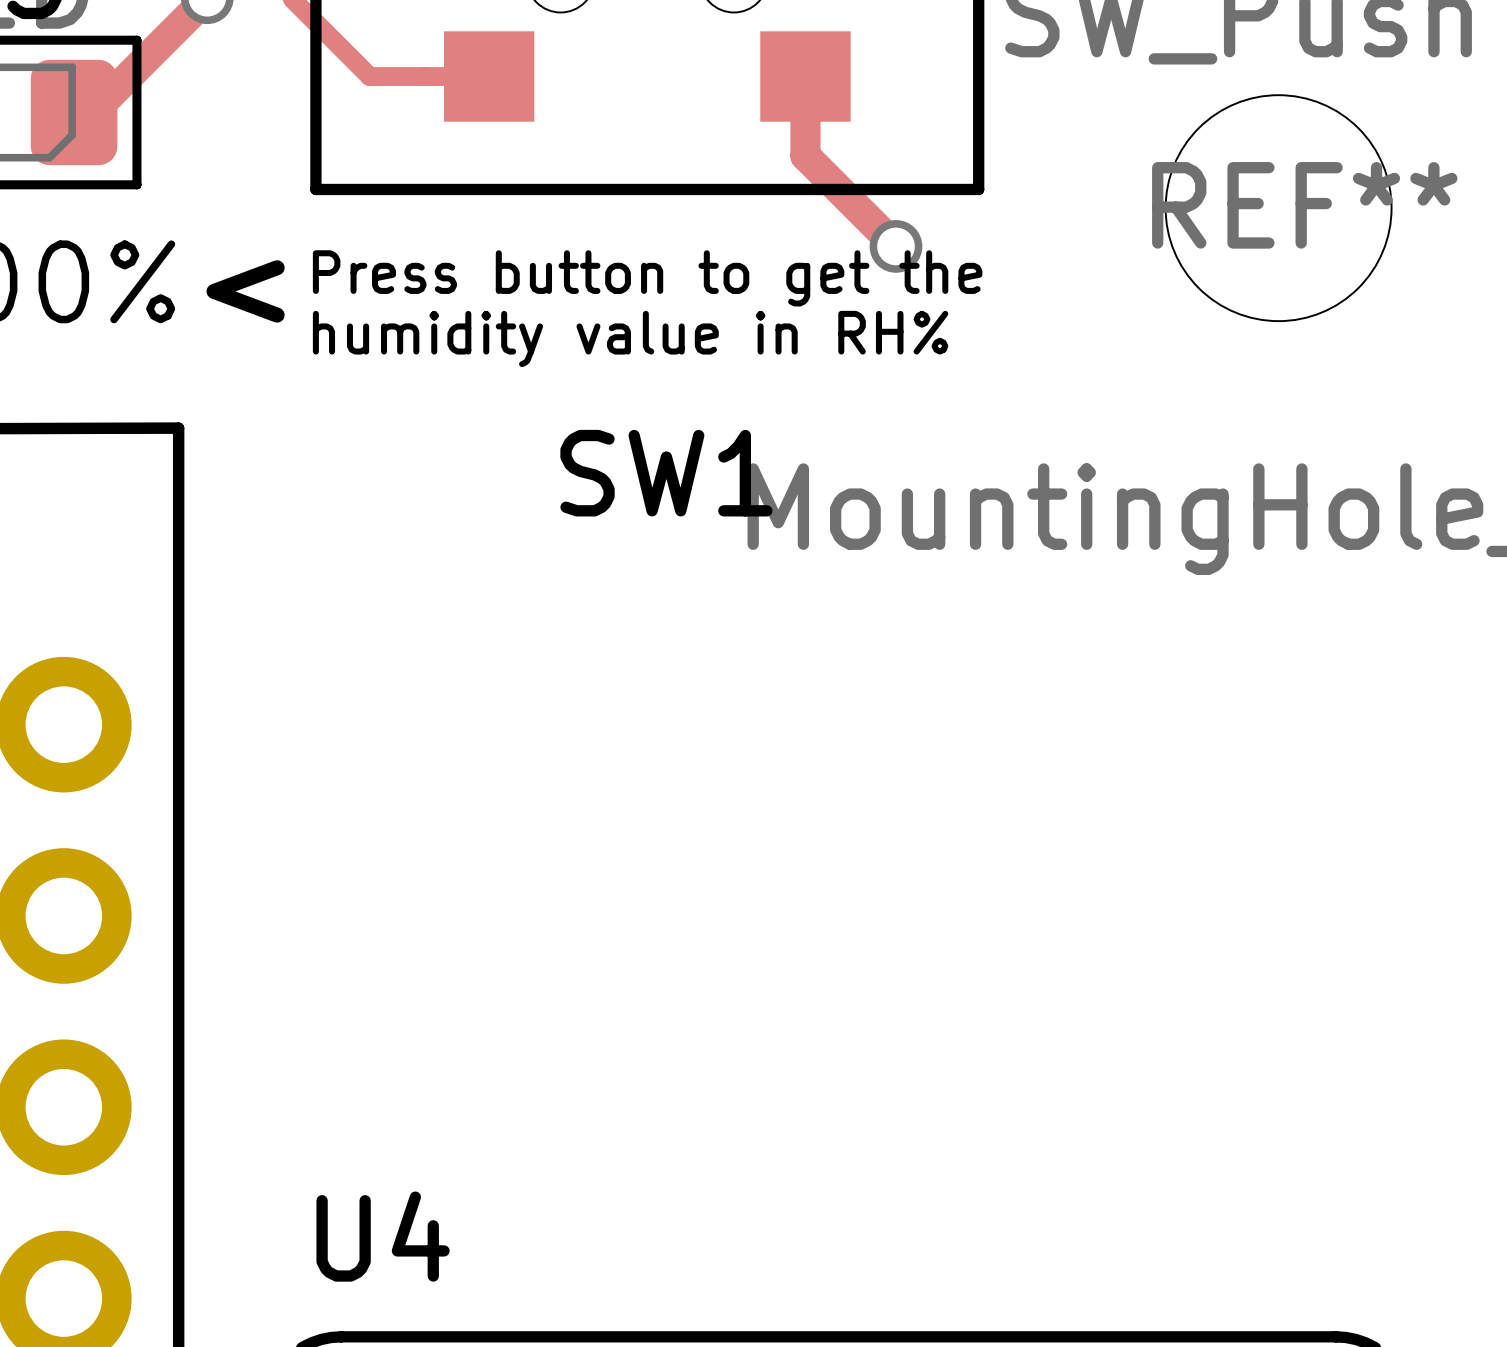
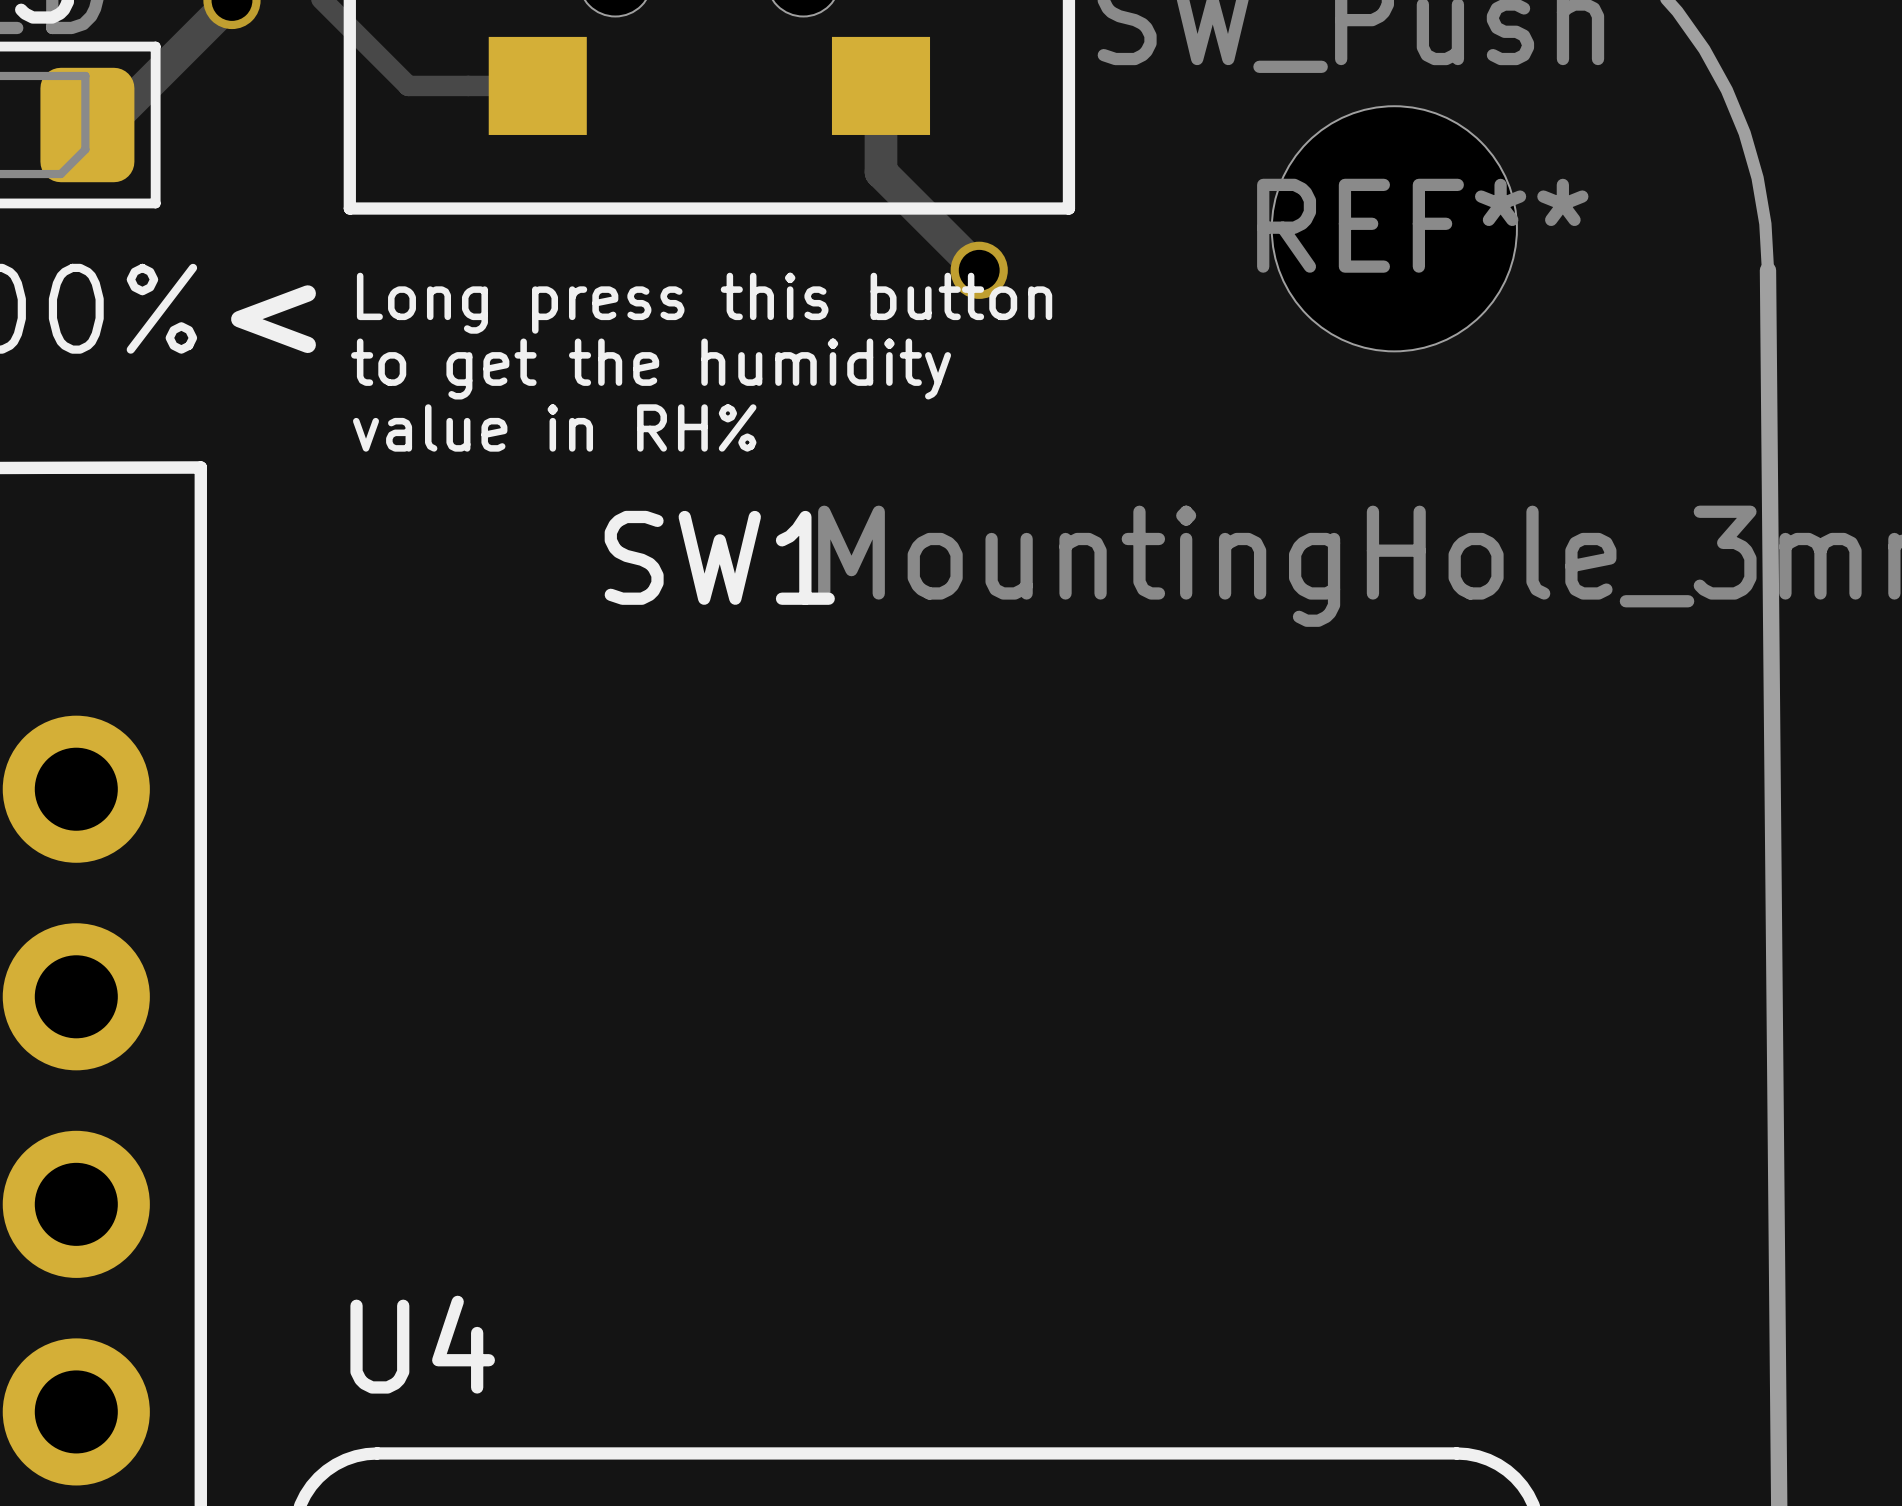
text: Press button to get the (647, 278) -> Long press this button (704, 303)
text: humidity value in RH% (630, 338) -> to get the humidity (651, 368)
text: none -> value in RH% (554, 427)
SW1 name position: SW1 (666, 473) -> SW1 (719, 557)

